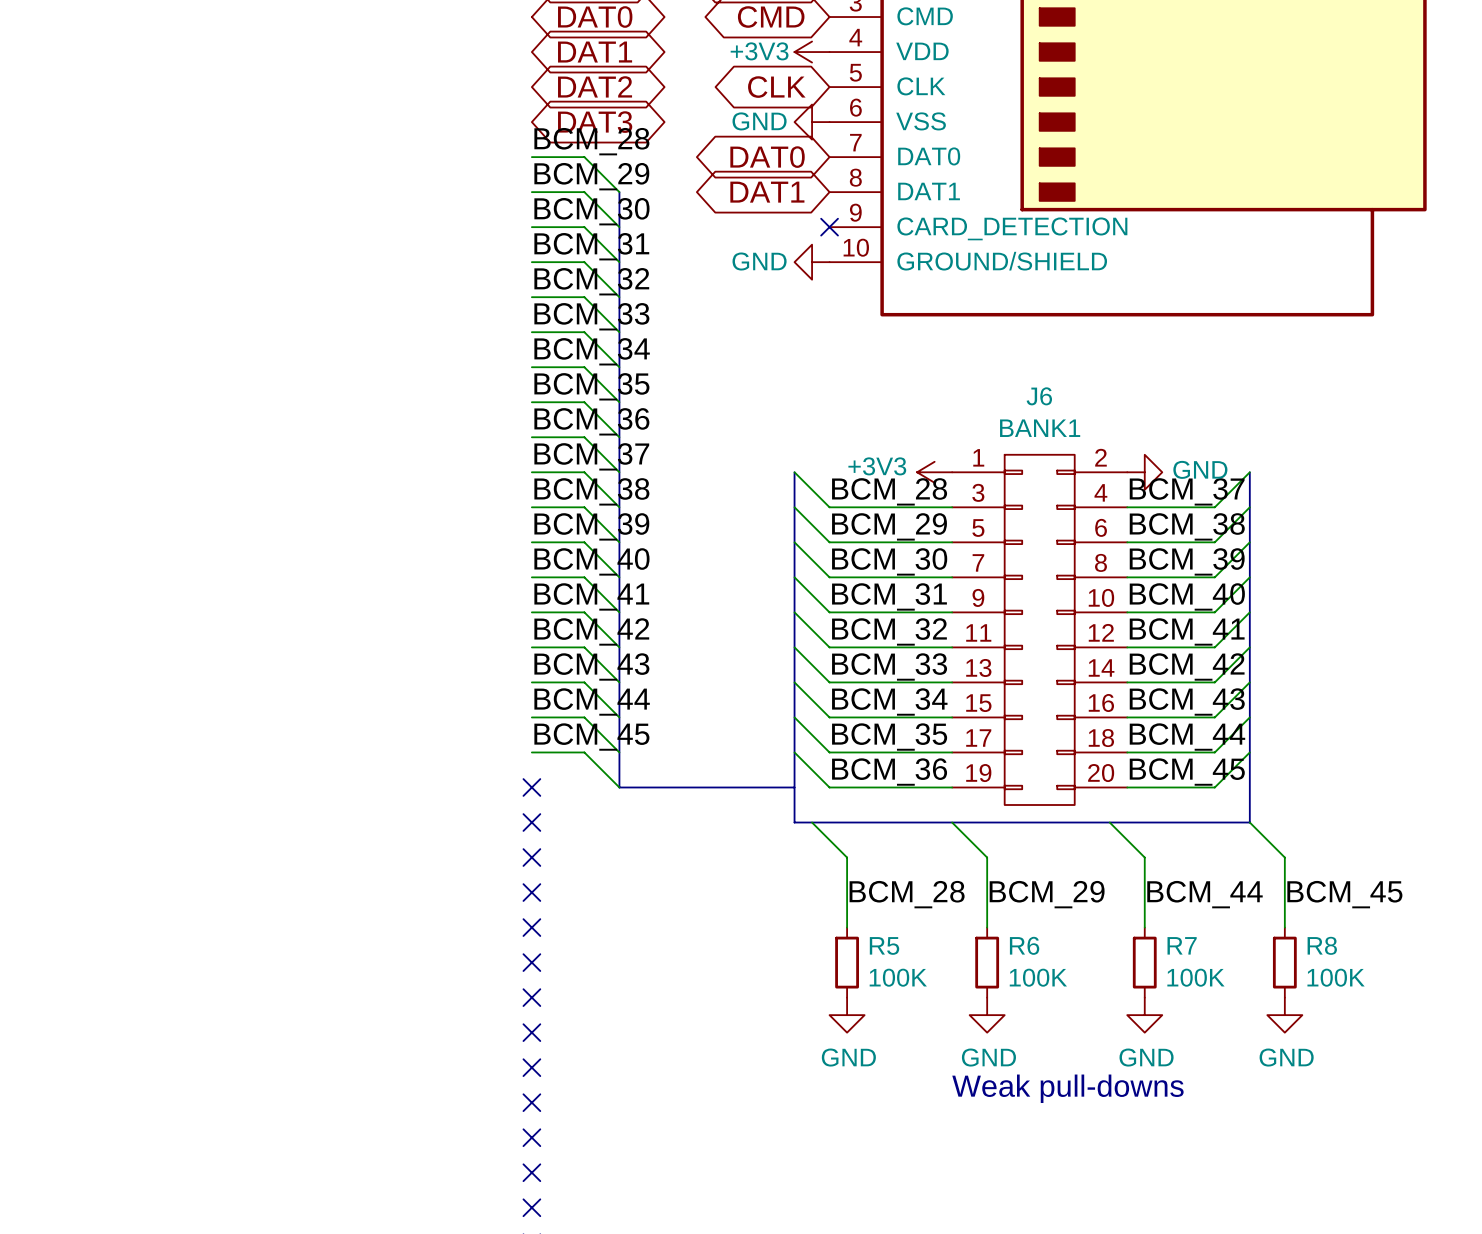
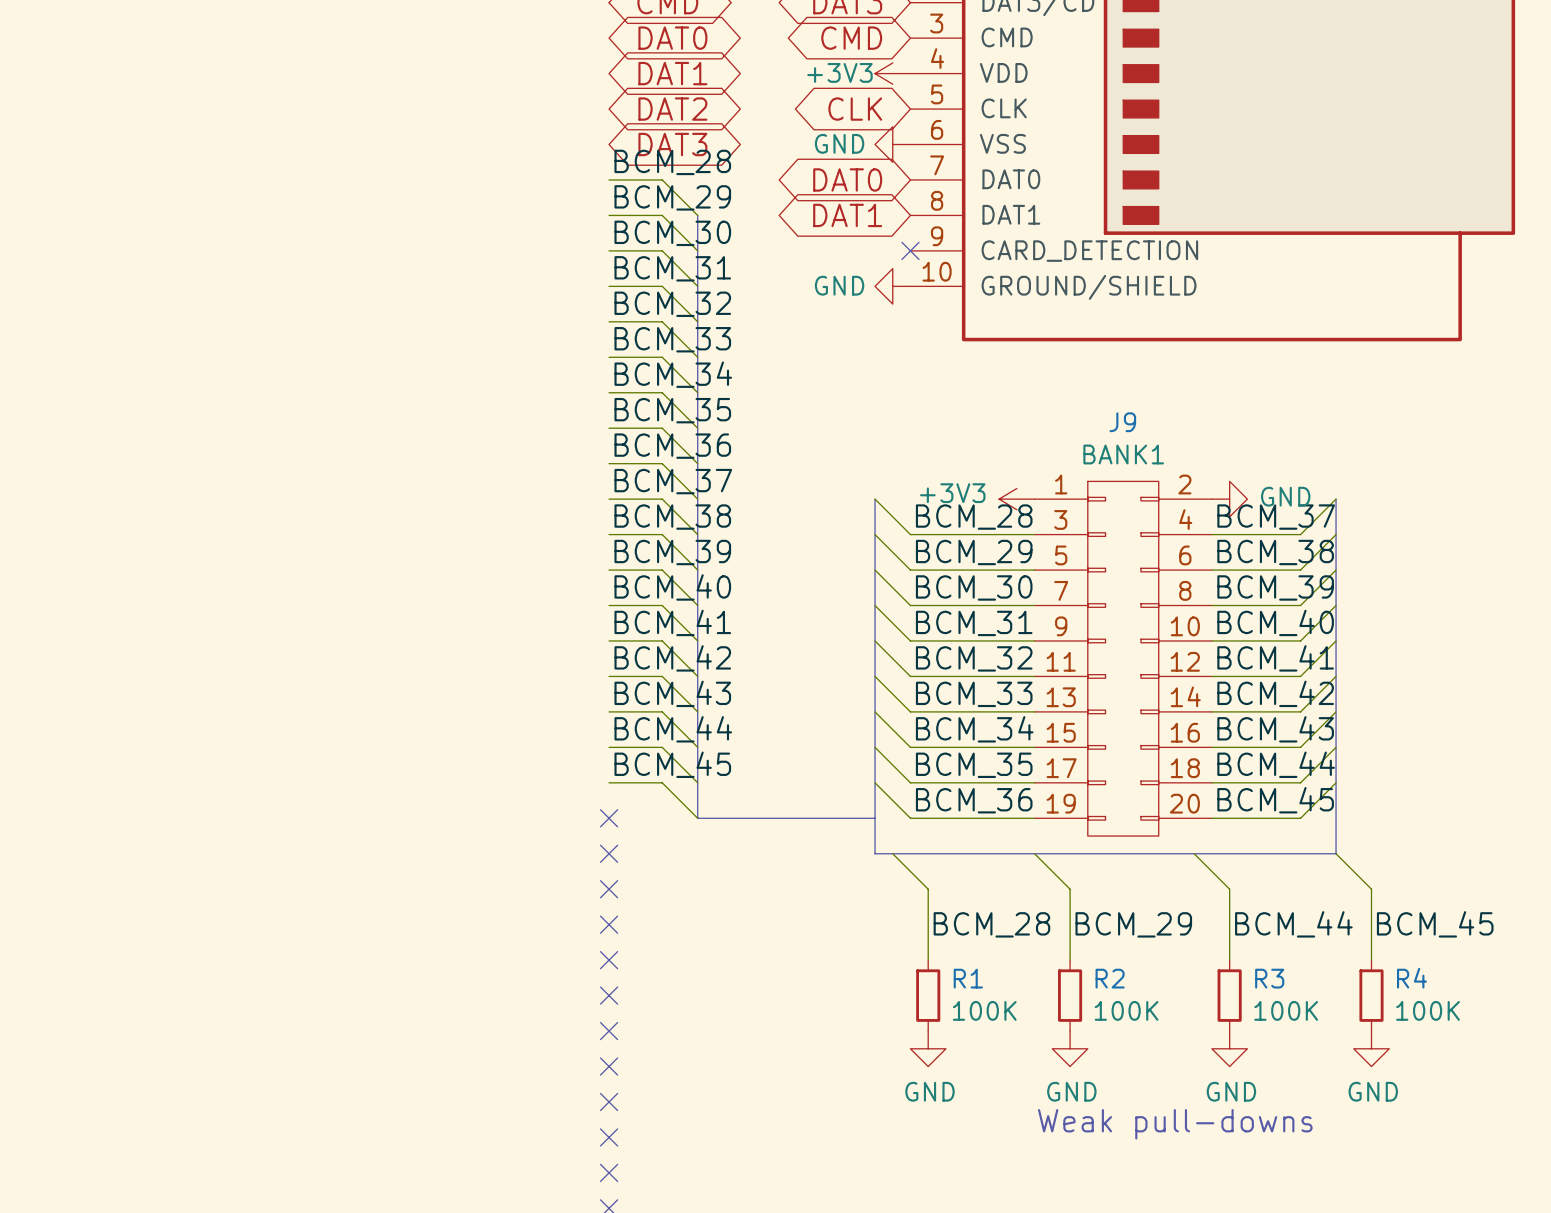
J6 name: J6 (1039, 396) -> J9 (1122, 422)
R5 name: R5 (884, 945) -> R1 (968, 978)
R6 name: R6 (1024, 945) -> R2 (1110, 978)
R7 name: R7 (1182, 945) -> R3 (1269, 978)
R8 name: R8 (1322, 945) -> R4 (1411, 978)

